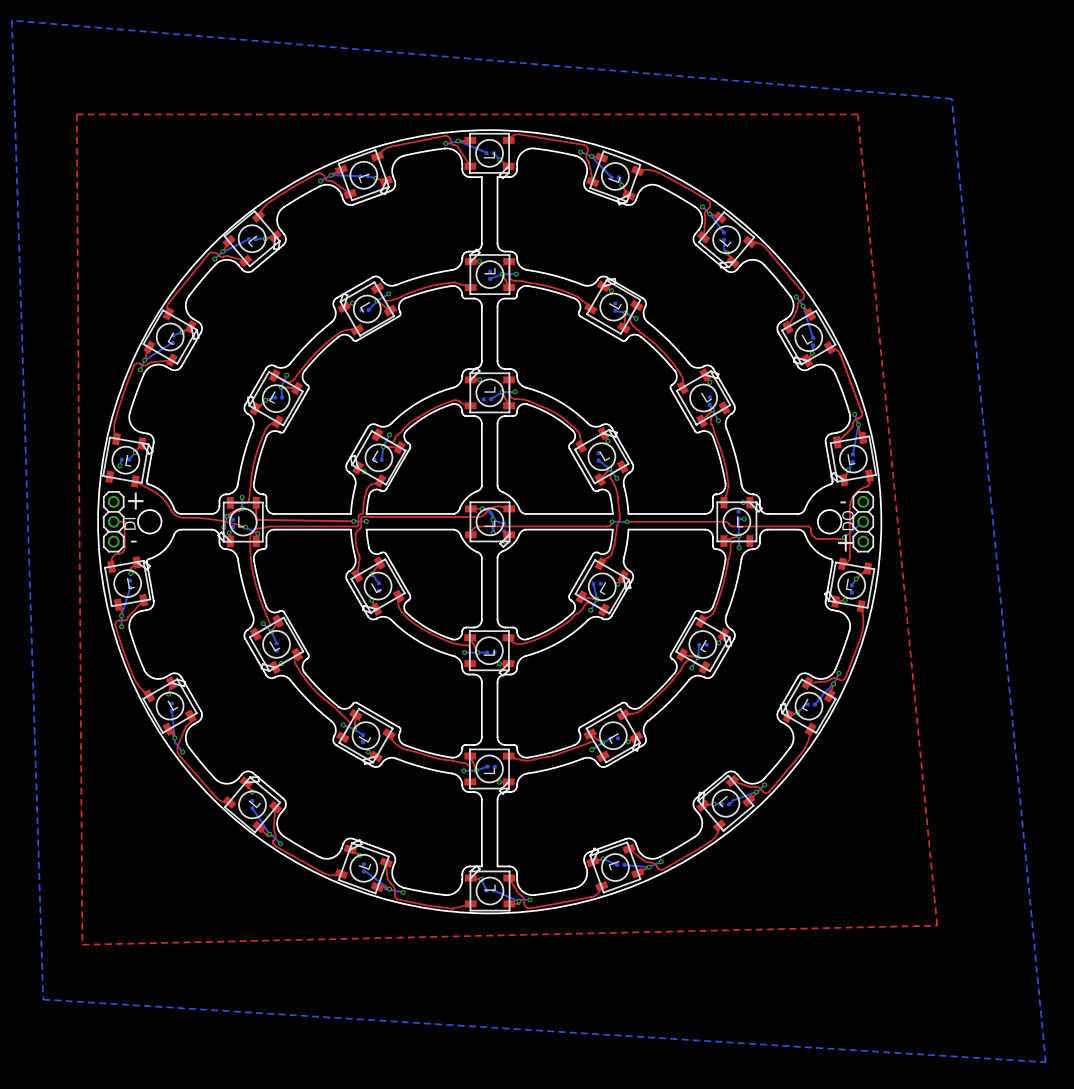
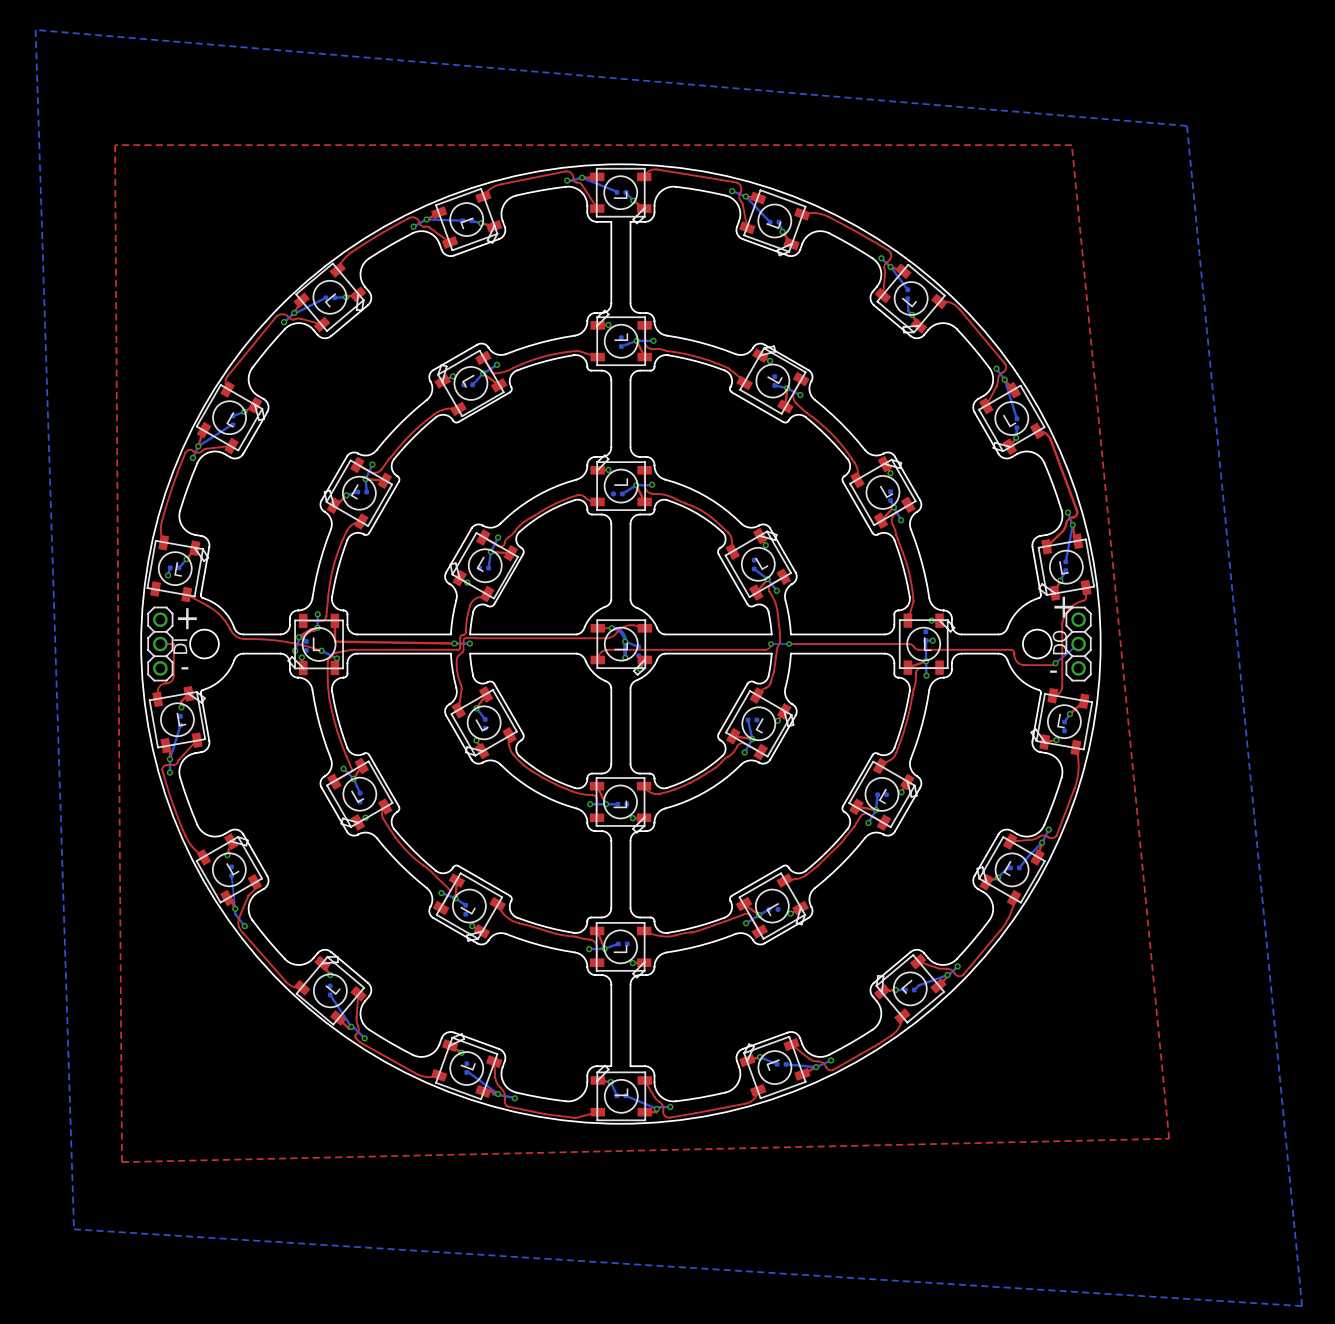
text position: - (843, 502) -> - (1053, 671)
text position: + (845, 542) -> + (1063, 607)

